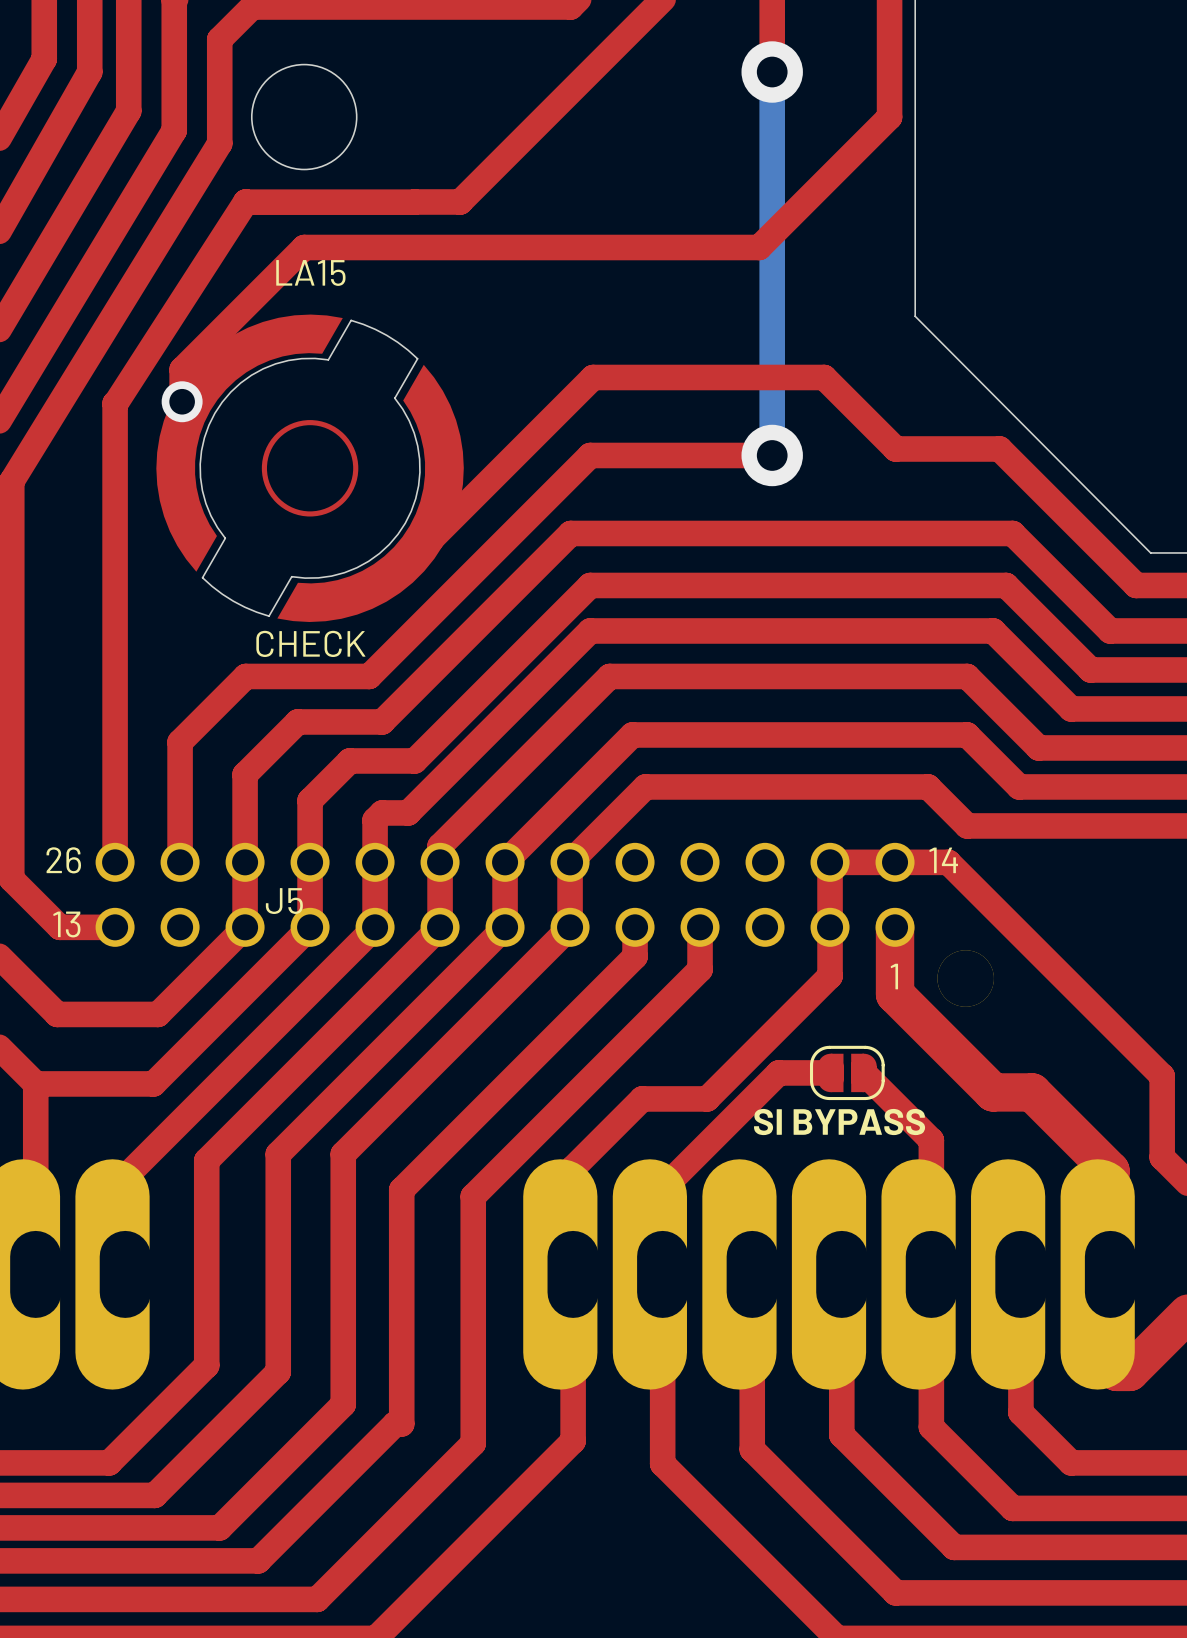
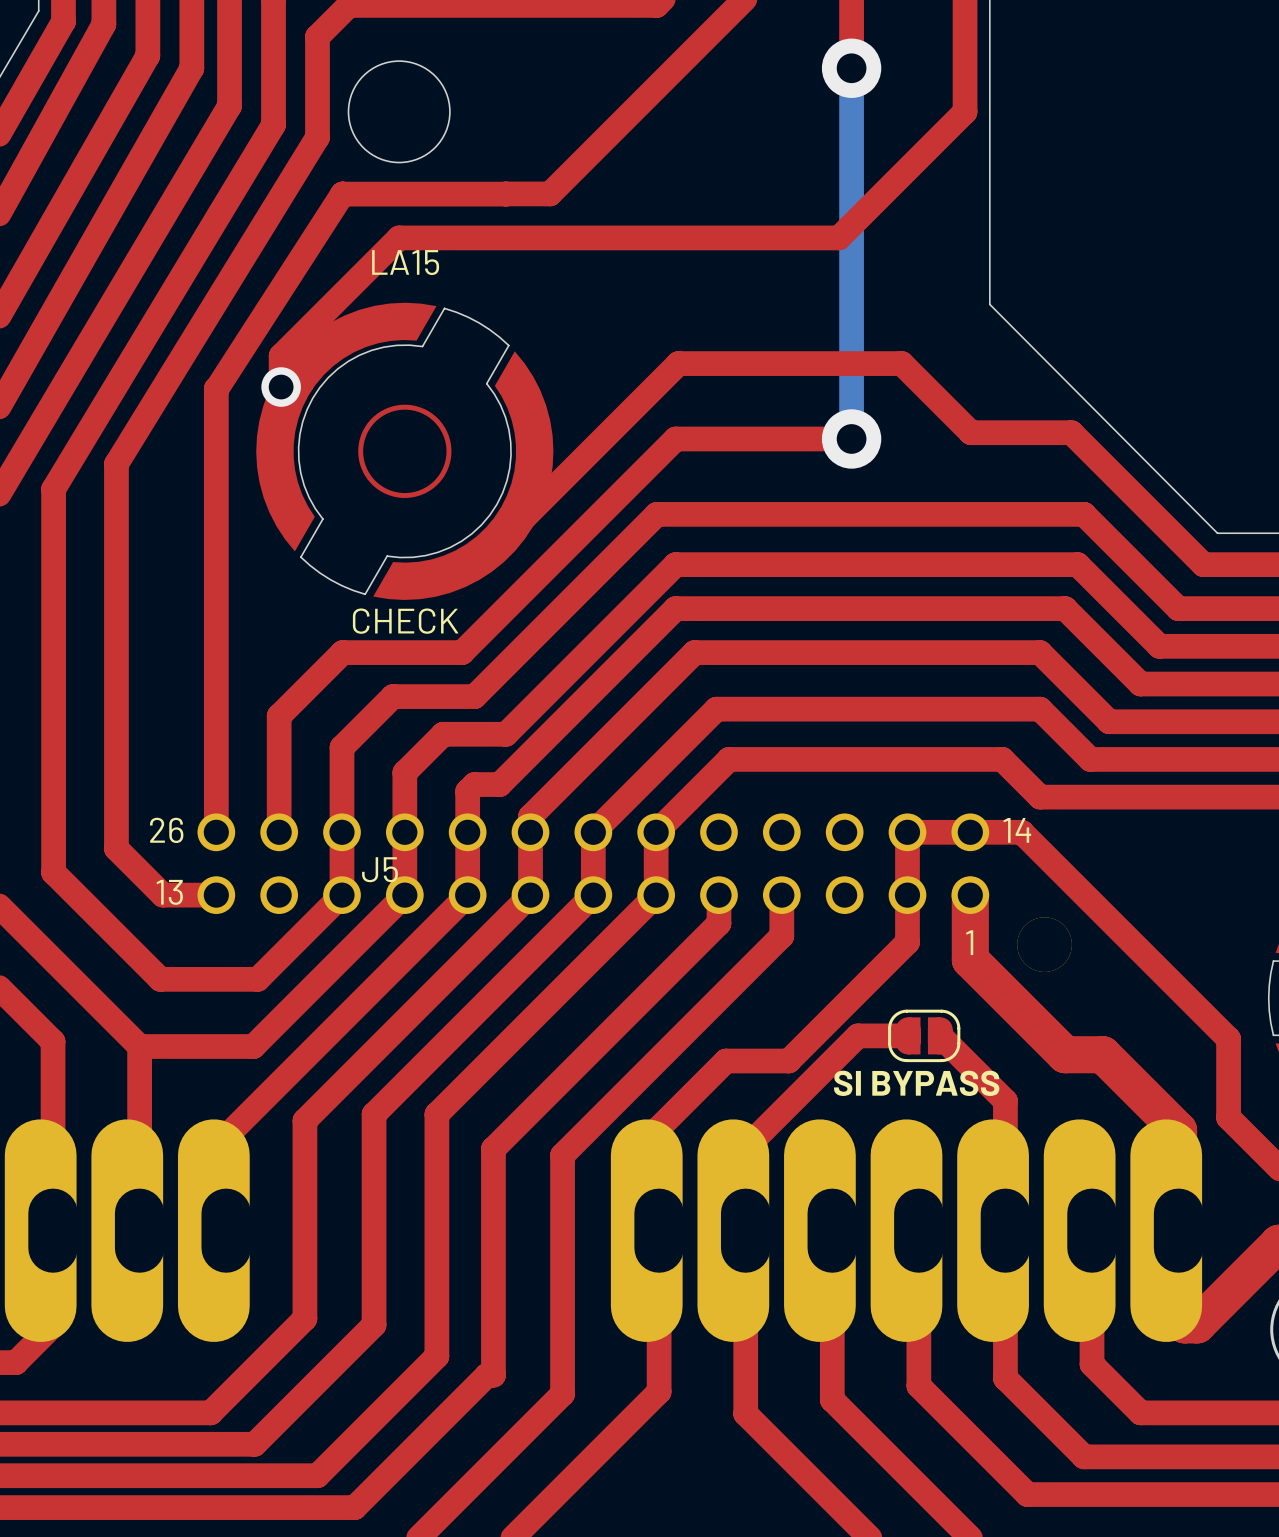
part footprint: [95, 842, 994, 1007] -> [197, 813, 1072, 972]

